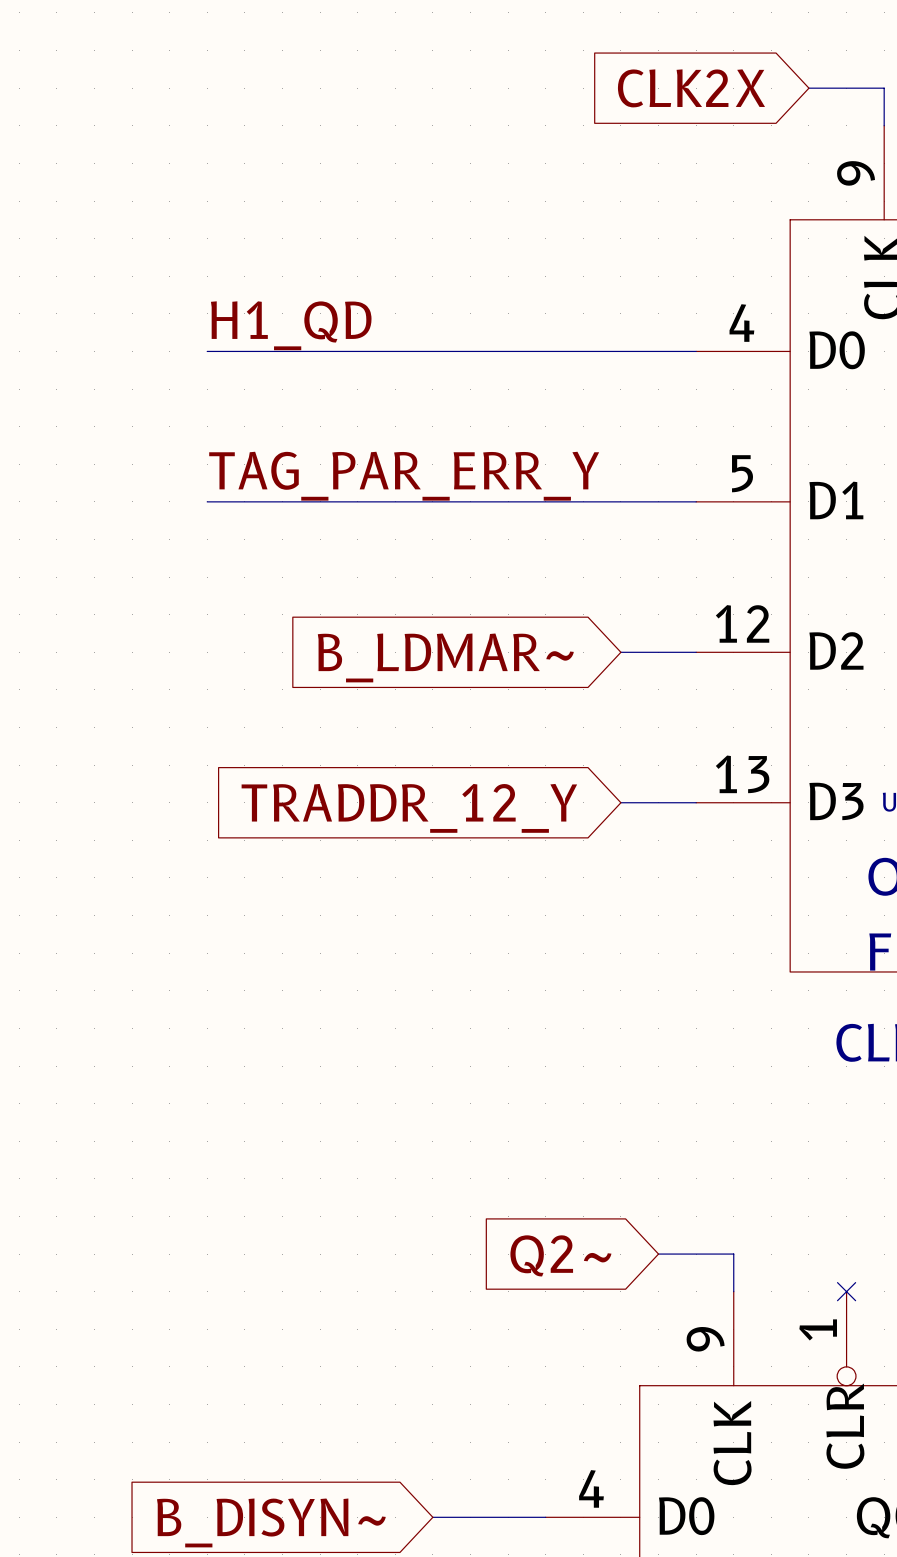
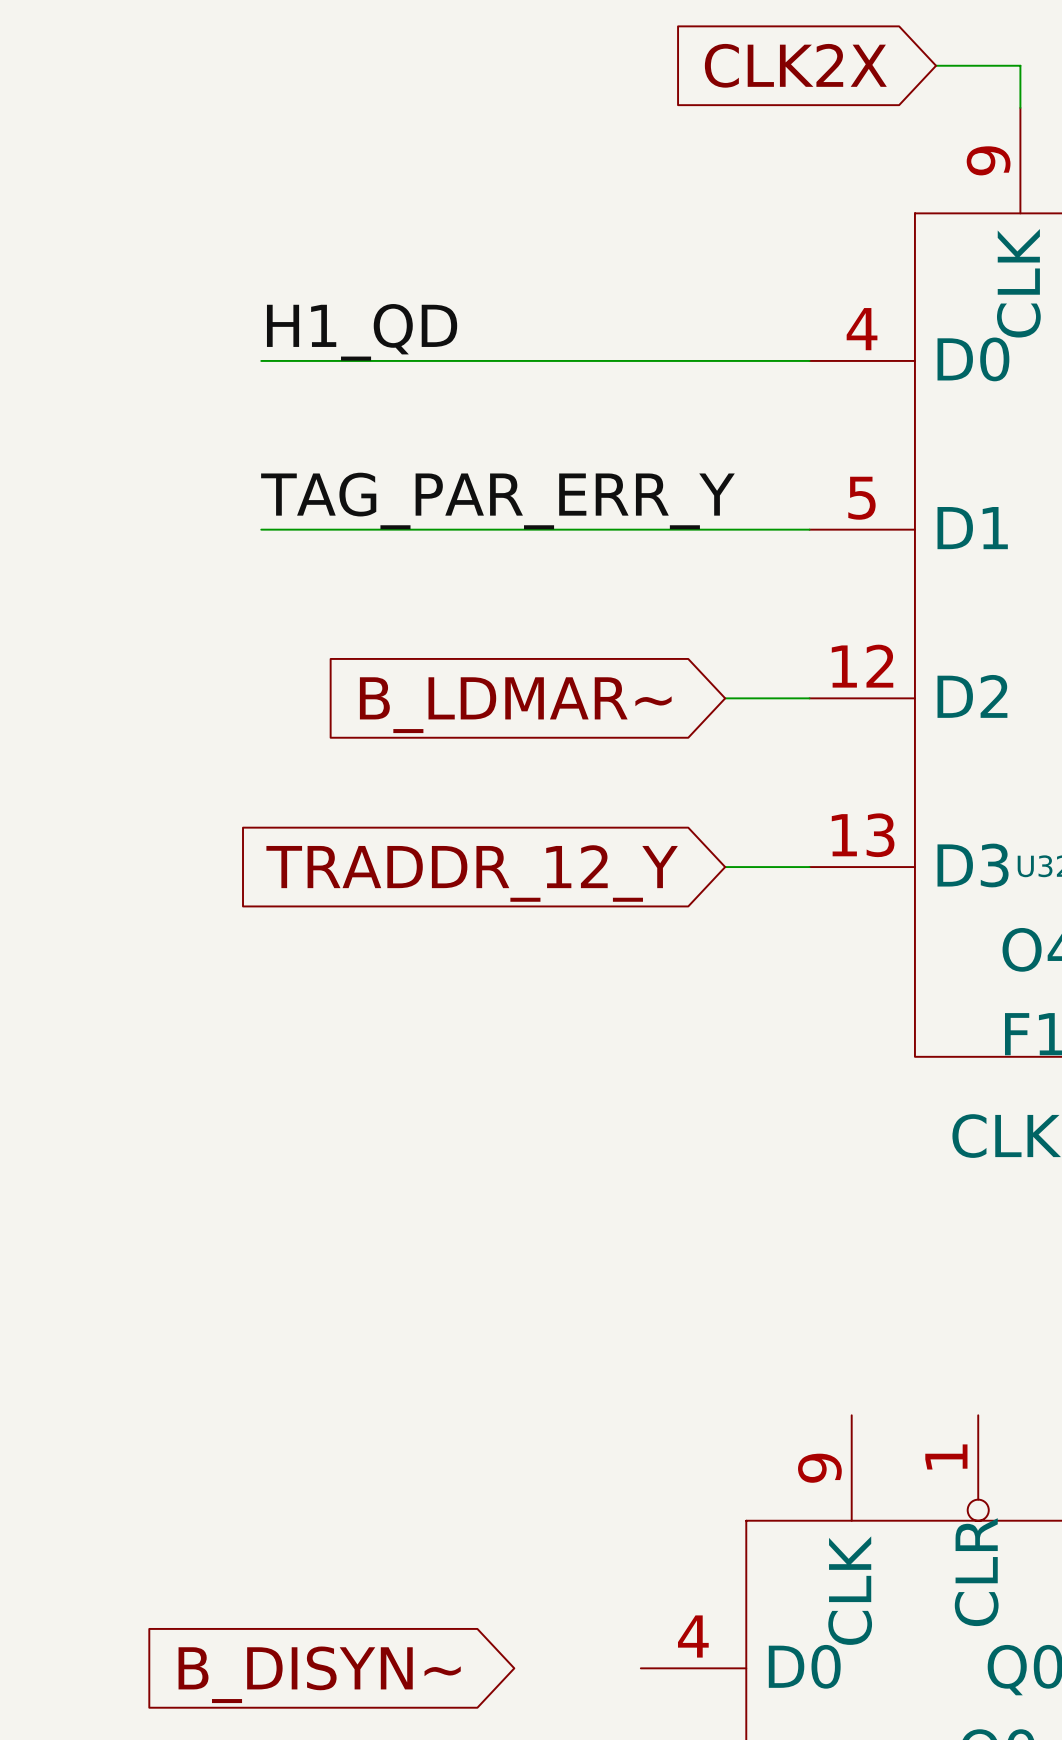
wire: (658, 1254) (733, 1254) (733, 1291) -> none
global label: Q2~ (560, 1255) -> none
no-connect mark: (846, 1291) -> none
wire: (432, 1517) (545, 1517) -> none

